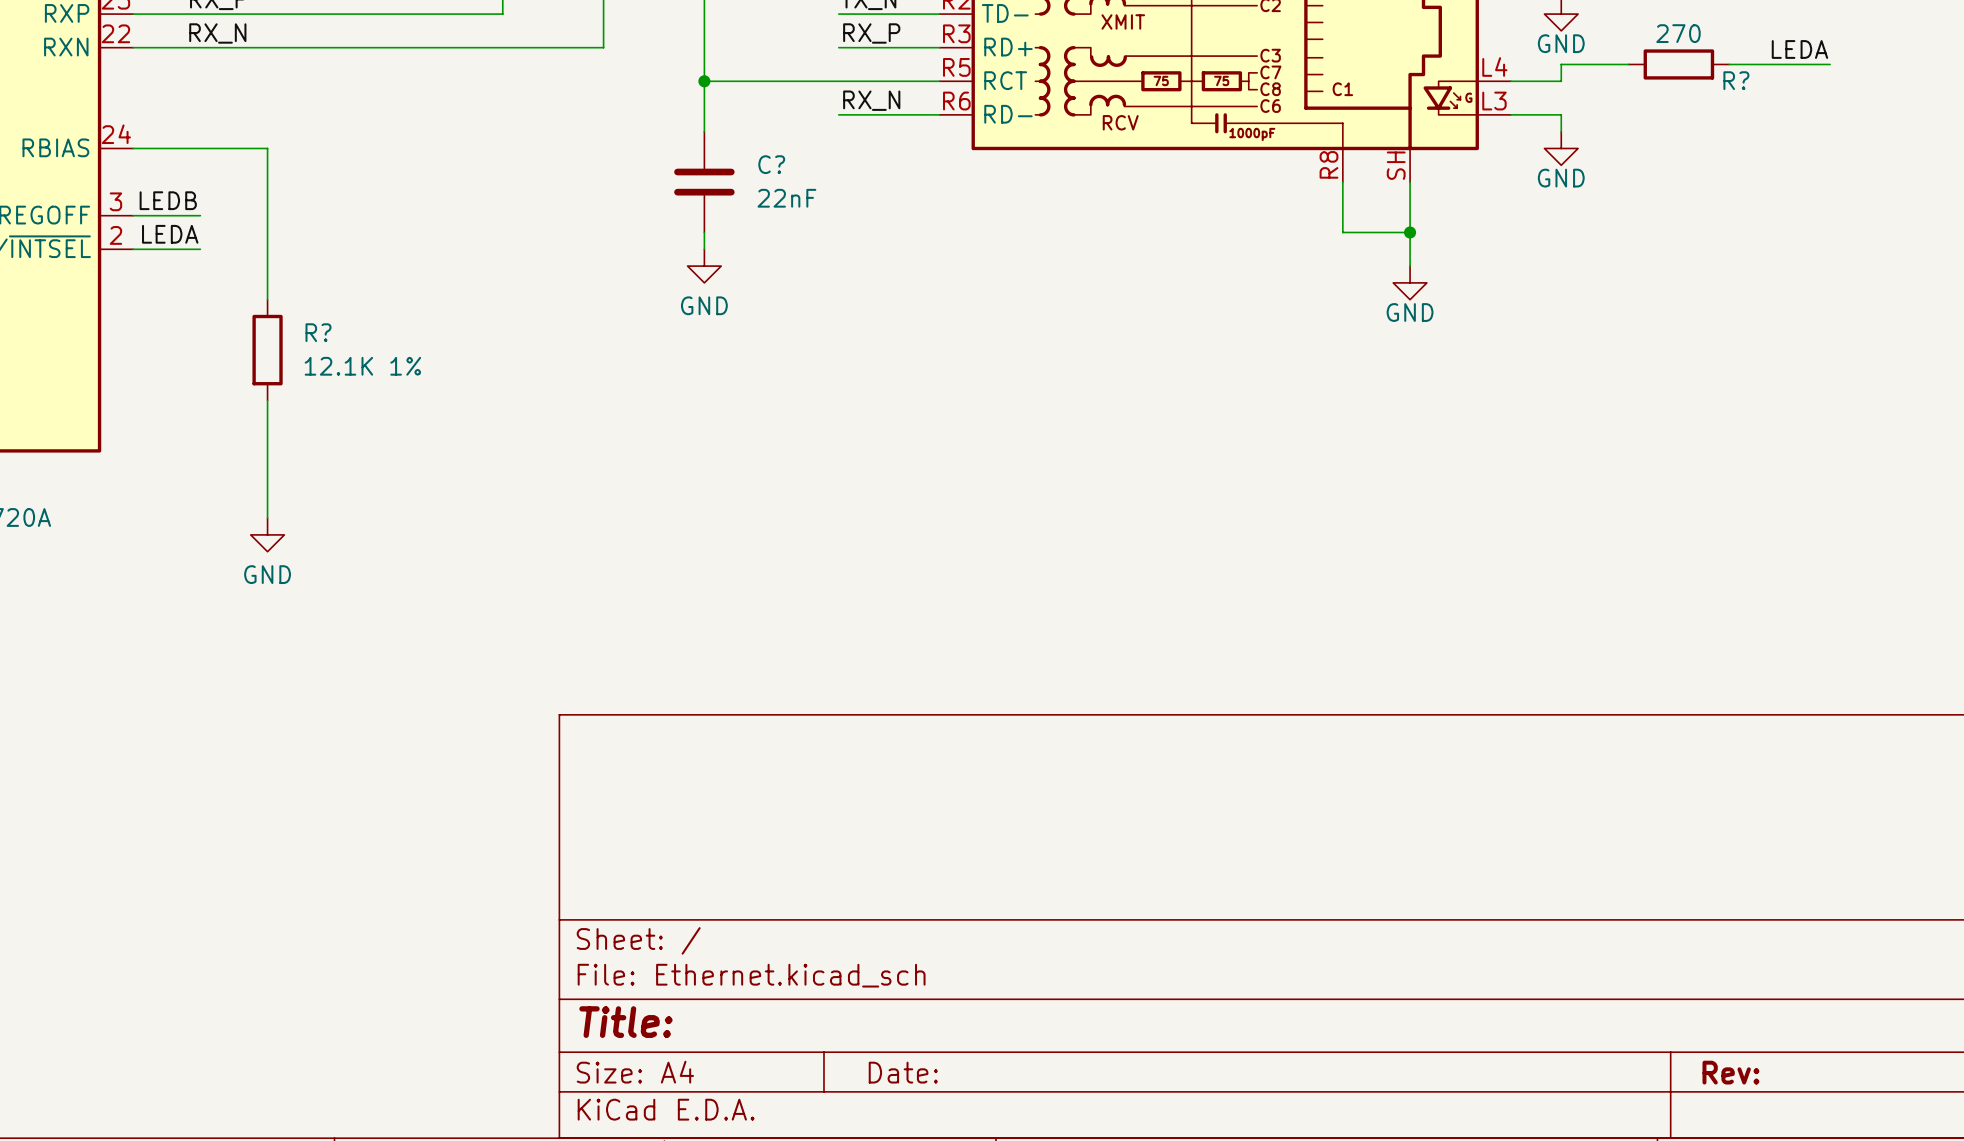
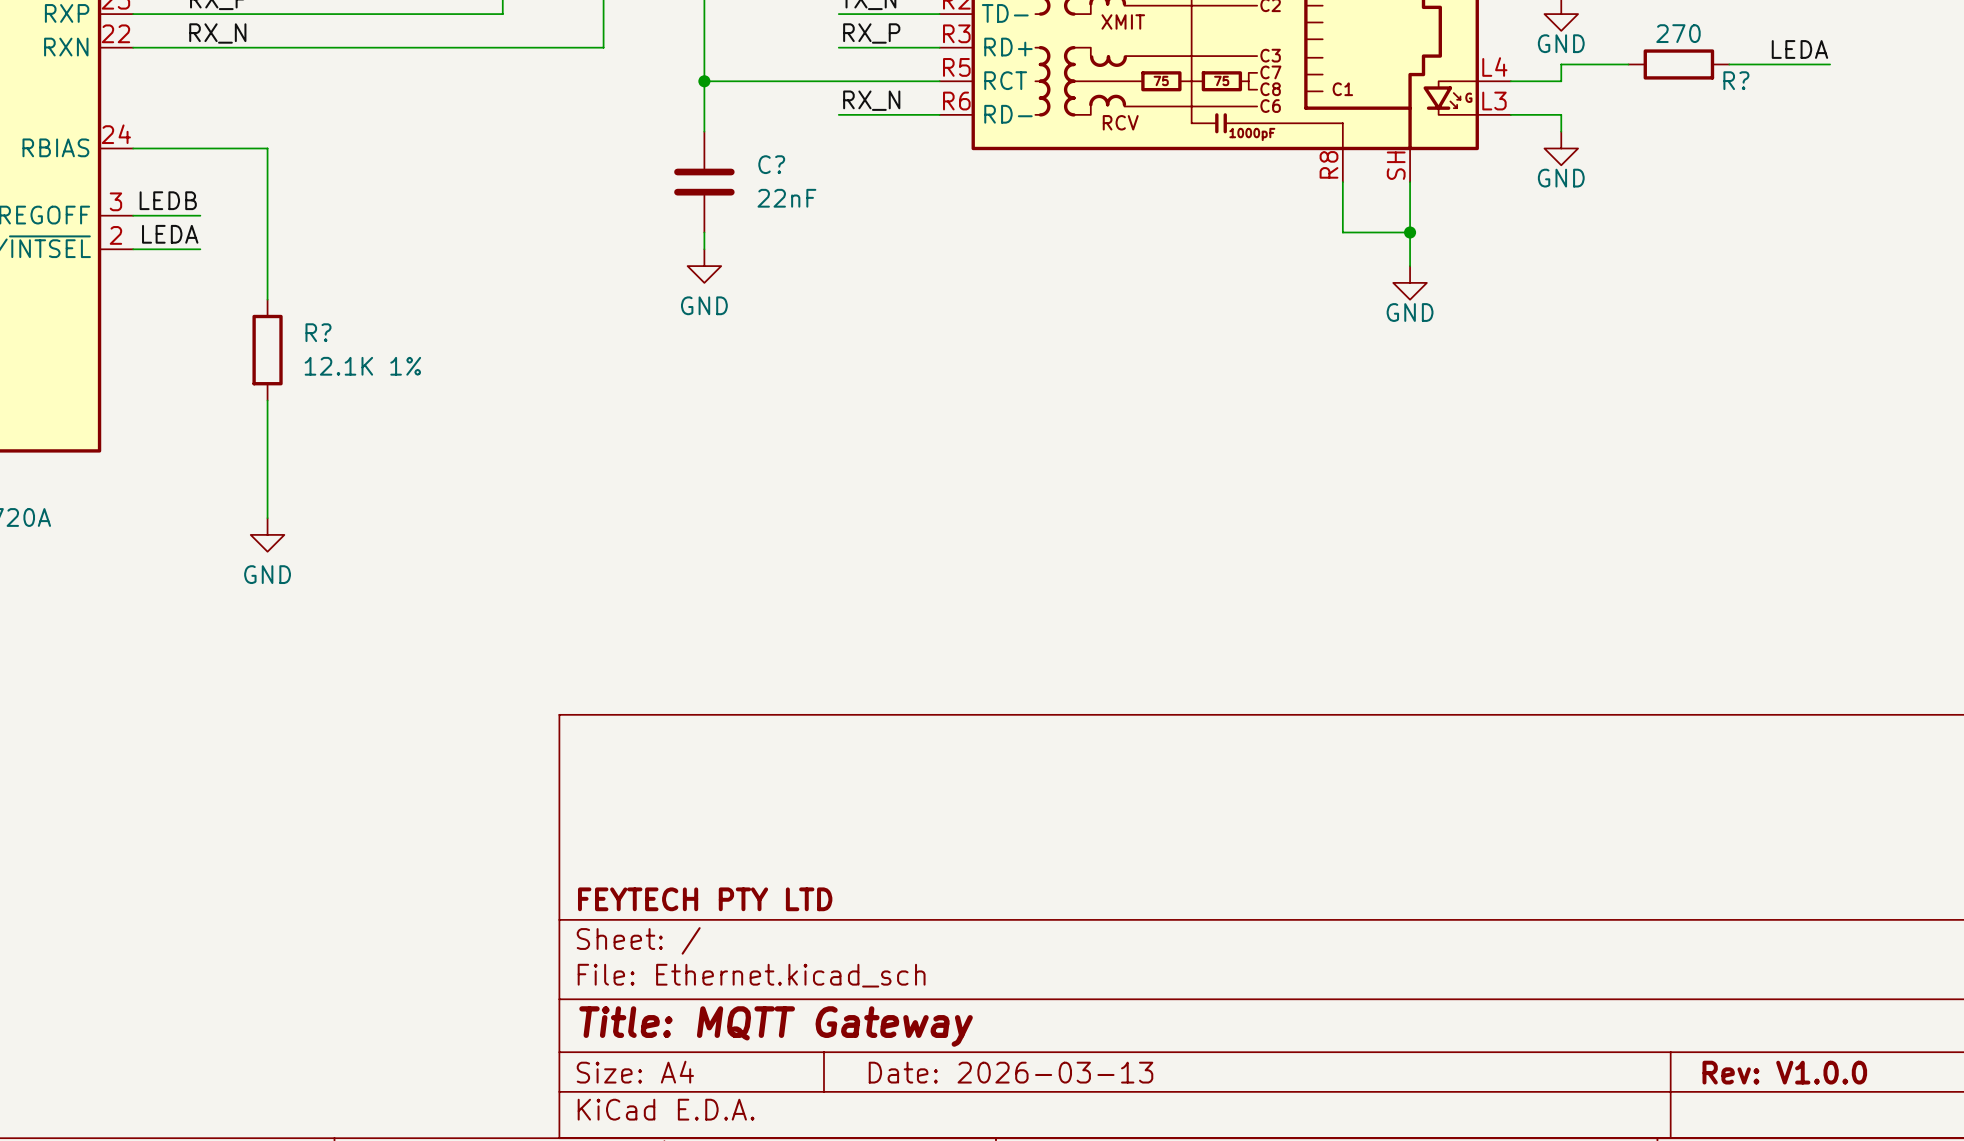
title block: none -> FEYTECH PTY LTD (705, 899)
title block: Title: (625, 1022) -> Title: MQTT Gateway (776, 1026)
title block: Date: (903, 1072) -> Date: 2026-03-13 (1011, 1072)
title block: Rev: (1730, 1072) -> Rev: V1.0.0 (1784, 1072)

